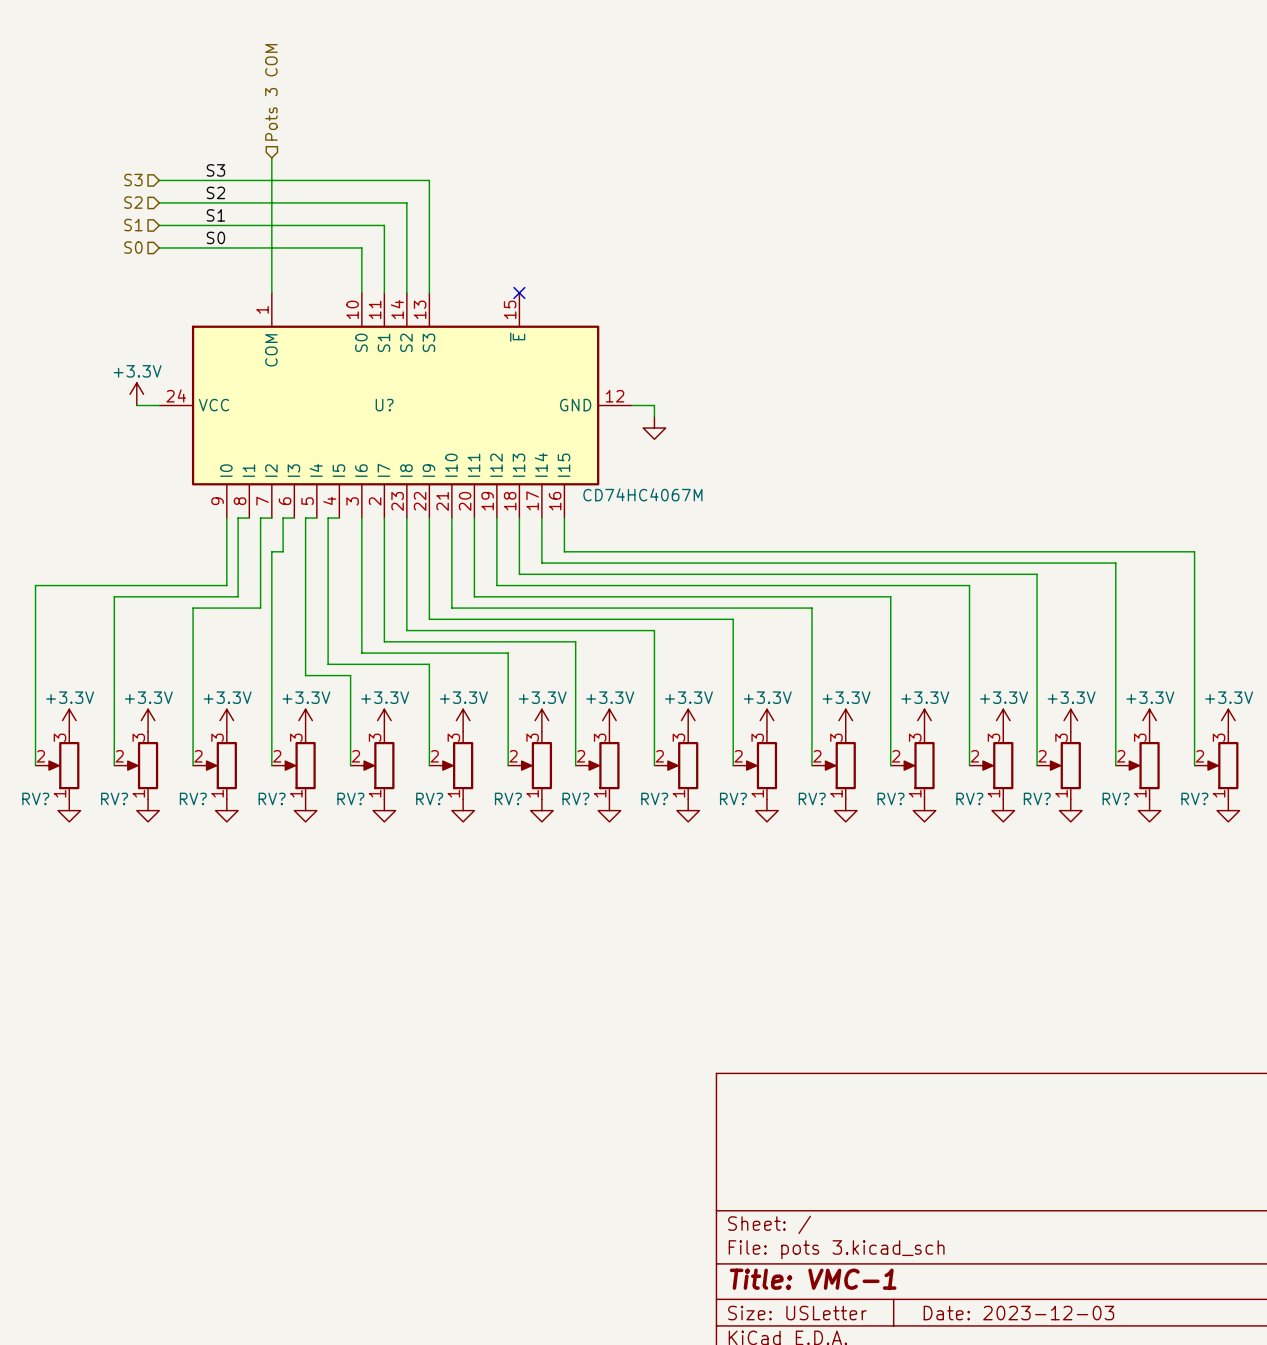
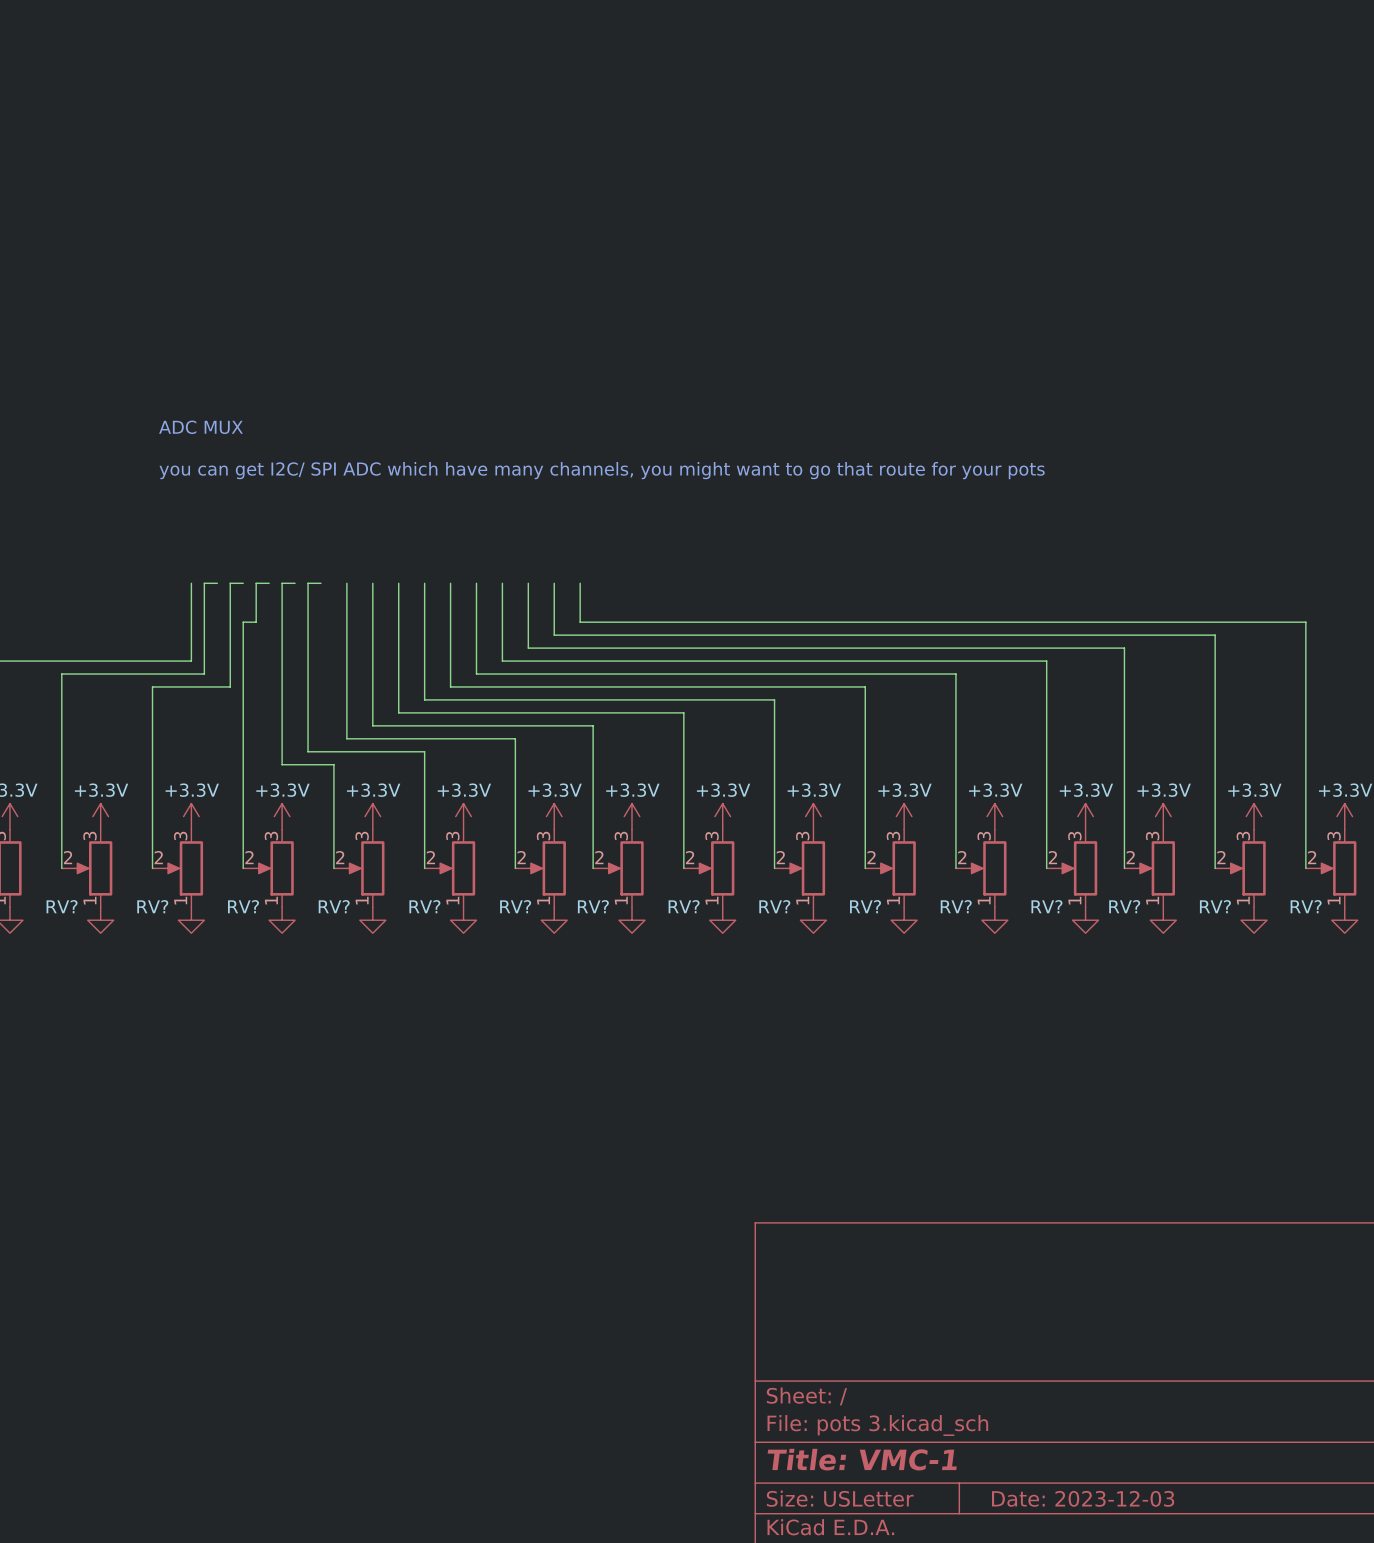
hierarchical label: Pots 3 COM (271, 92) -> none
wire: (271, 157) (271, 292) -> none
label: S3 (215, 170) -> none
hierarchical label: S3 (133, 180) -> none
wire: (159, 180) (429, 180) (429, 292) -> none
label: S2 (215, 192) -> none
hierarchical label: S2 (133, 202) -> none
wire: (159, 202) (406, 202) (406, 292) -> none
label: S1 (215, 215) -> none
hierarchical label: S1 (133, 225) -> none
wire: (159, 225) (384, 225) (384, 292) -> none
label: S0 (215, 237) -> none
hierarchical label: S0 (133, 247) -> none
wire: (159, 247) (361, 247) (361, 292) -> none
no-connect mark: (519, 292) -> none
text: none -> ADC MUX (201, 427)
power symbol: +3.3V (136, 394) -> none
wire: (136, 405) (159, 405) -> none
U?: CD74HC4067M (395, 405) -> none
wire: (631, 405) (654, 405) (654, 416) -> none
text: none -> you can get I2C/ SPI ADC which have many channels, you might want to go that route for your pots (602, 470)
power symbol: (654, 428) -> none

